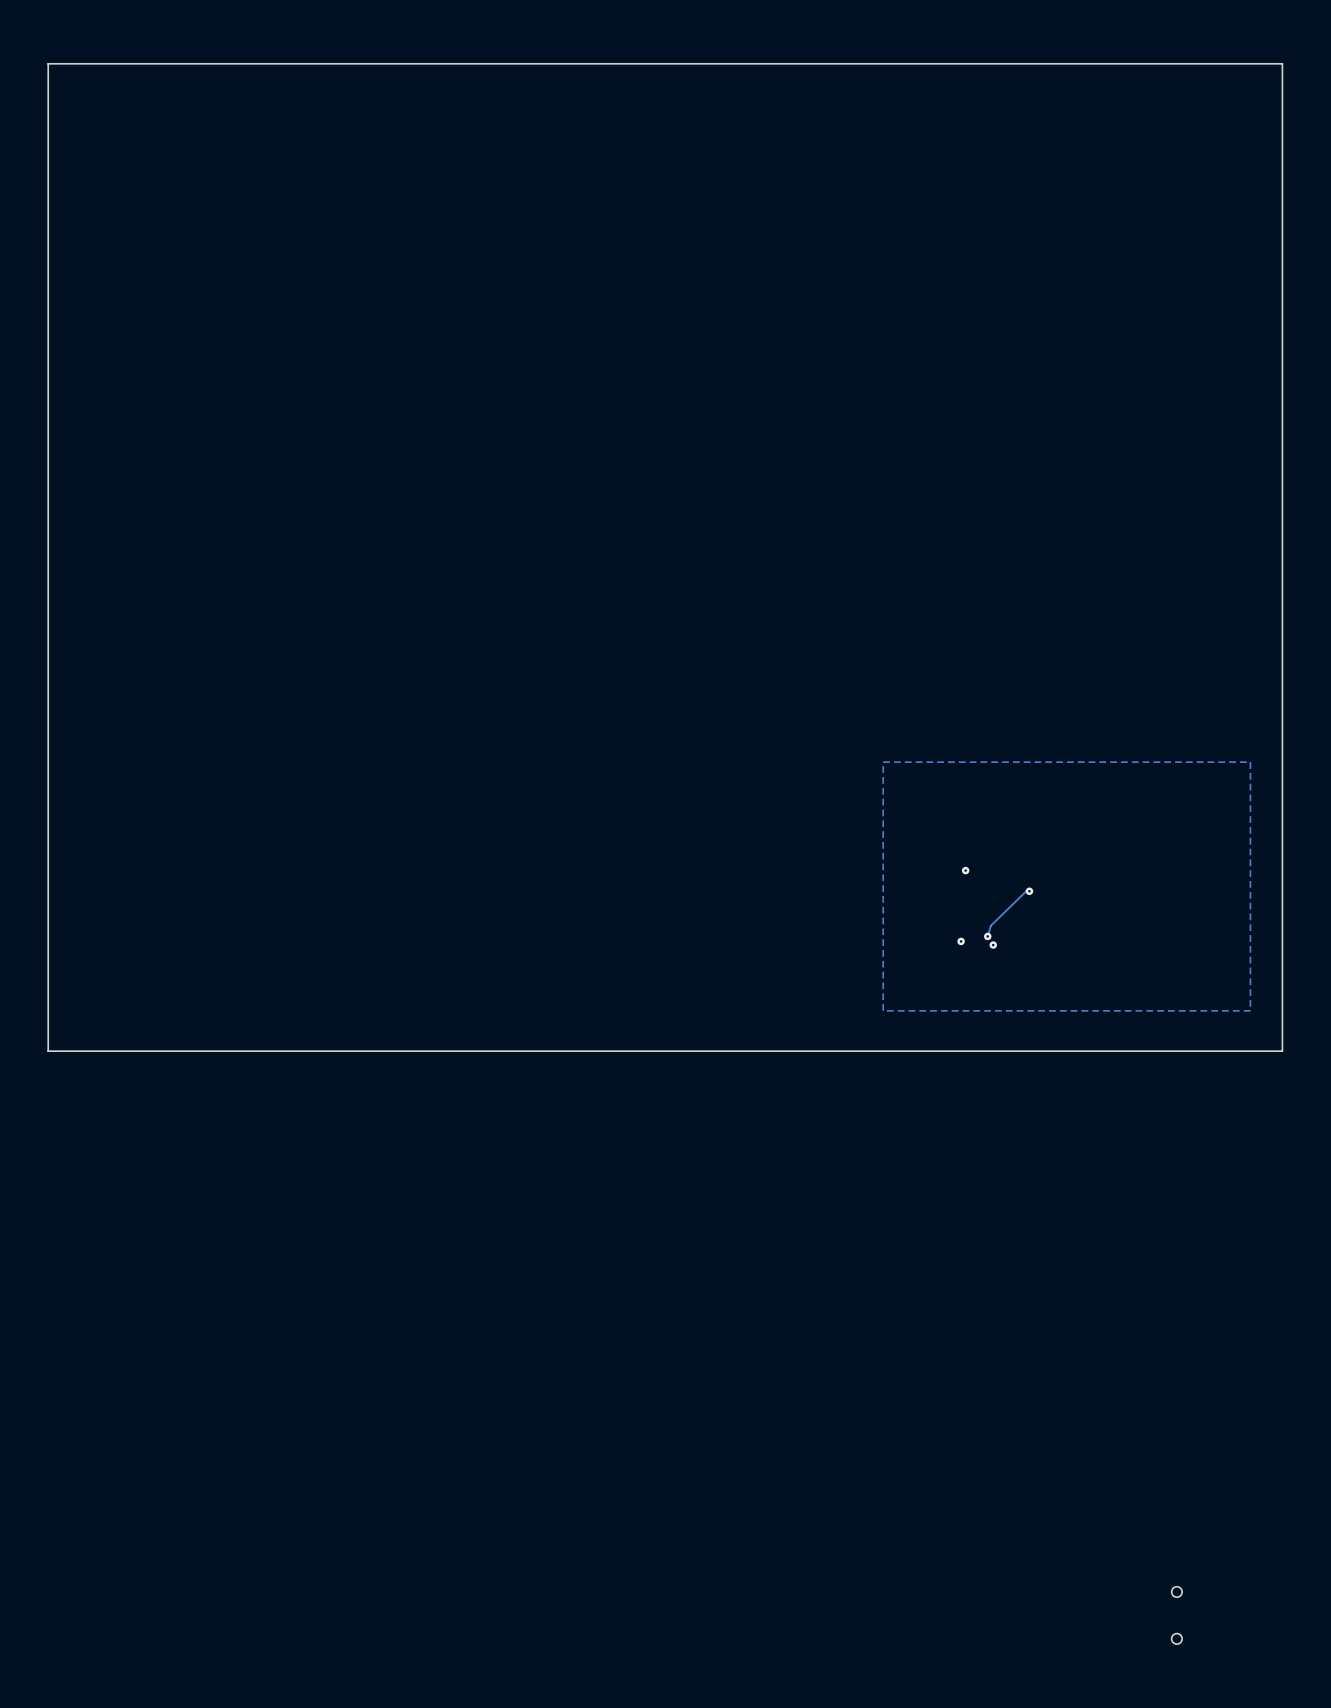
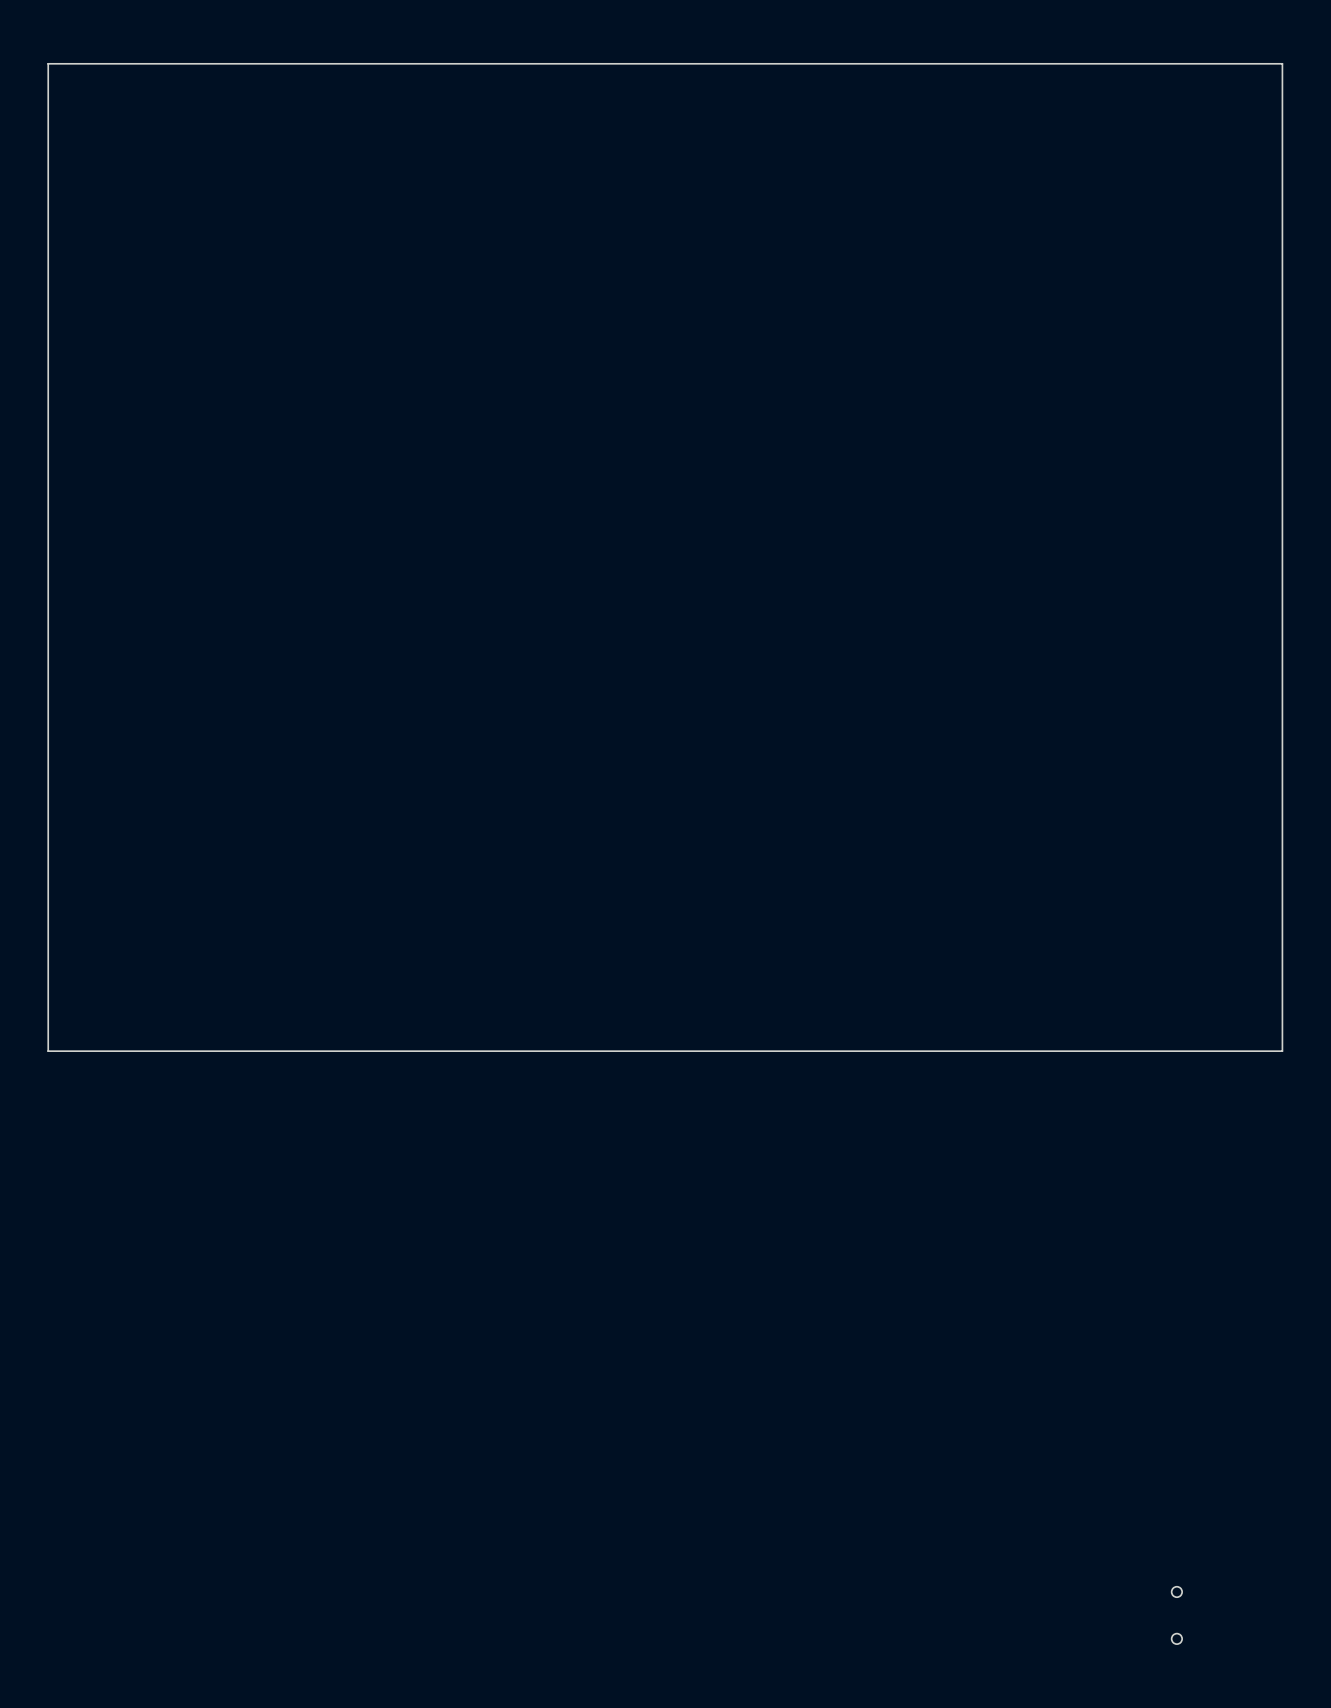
zone outline: (1250, 762) (1250, 1010) (883, 1010) (883, 762) (1250, 762) -> none
via: (965, 870) -> none
track: (1029, 891) (1026, 891) (990, 925) (987, 936) -> none
via: (1029, 891) -> none
via: (987, 936) -> none
via: (961, 941) -> none
via: (993, 945) -> none

